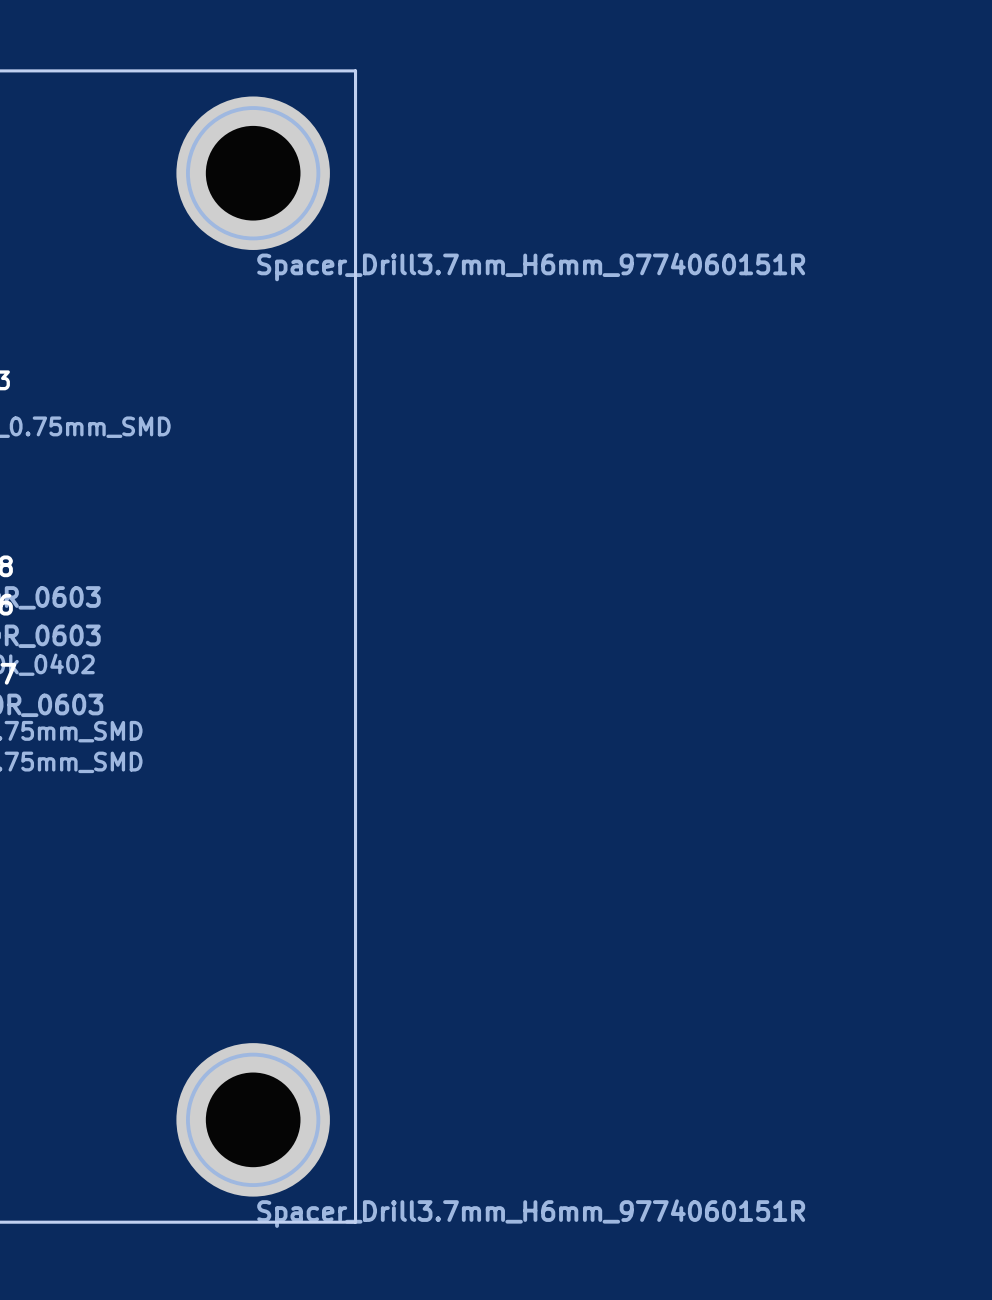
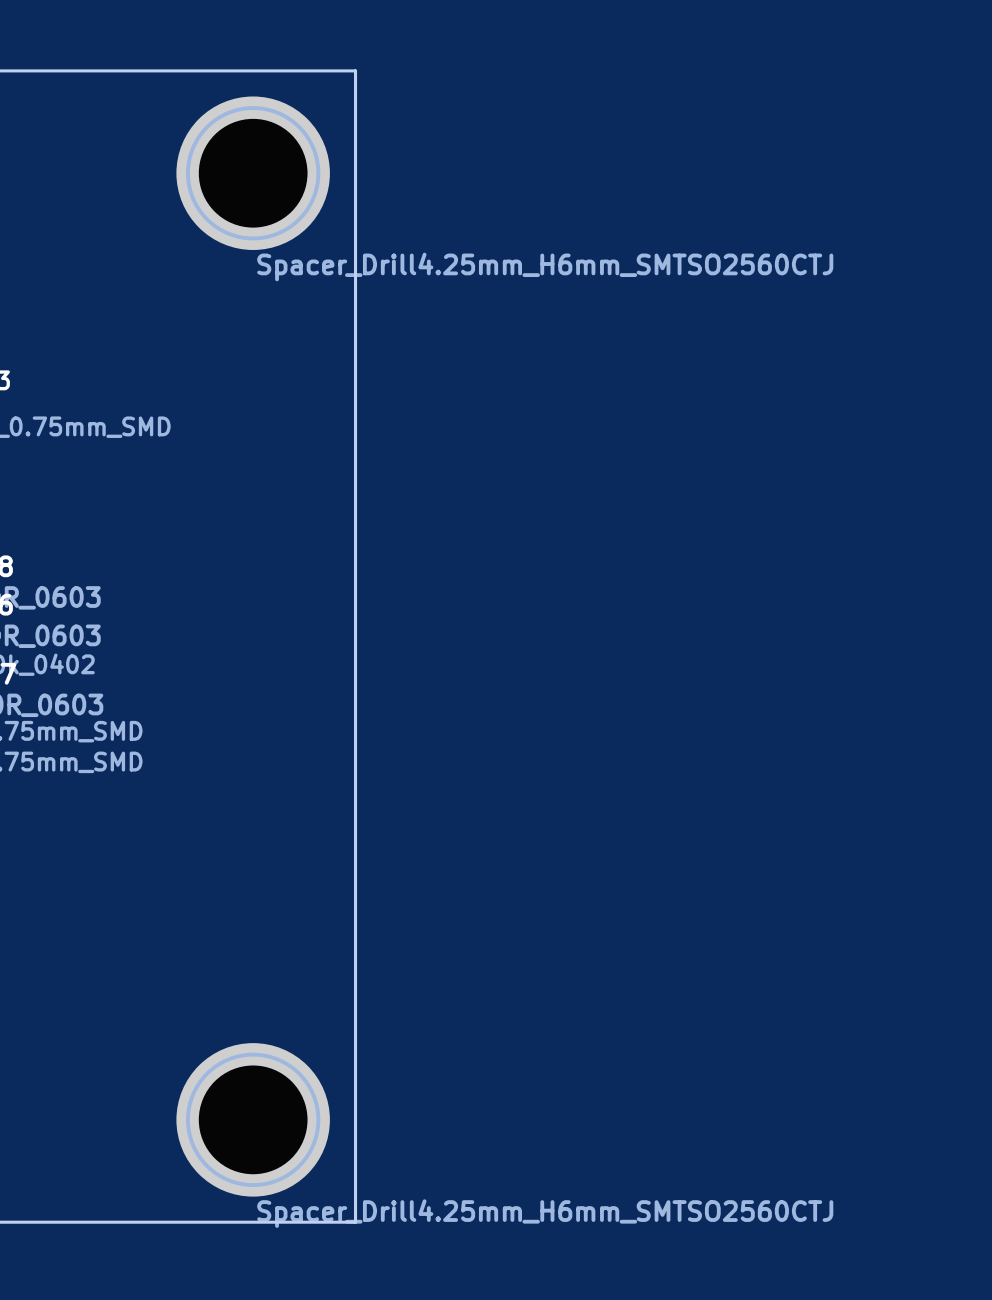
part footprint: [176, 96, 330, 250] -> [176, 96, 330, 250]
part value: Spacer_Drill3.7mm_H6mm_9774060151R (531, 266) -> Spacer_Drill4.25mm_H6mm_SMTSO2560CTJ (545, 266)
part footprint: [176, 1043, 330, 1197] -> [176, 1043, 330, 1197]
part value: Spacer_Drill3.7mm_H6mm_9774060151R (531, 1213) -> Spacer_Drill4.25mm_H6mm_SMTSO2560CTJ (545, 1213)

